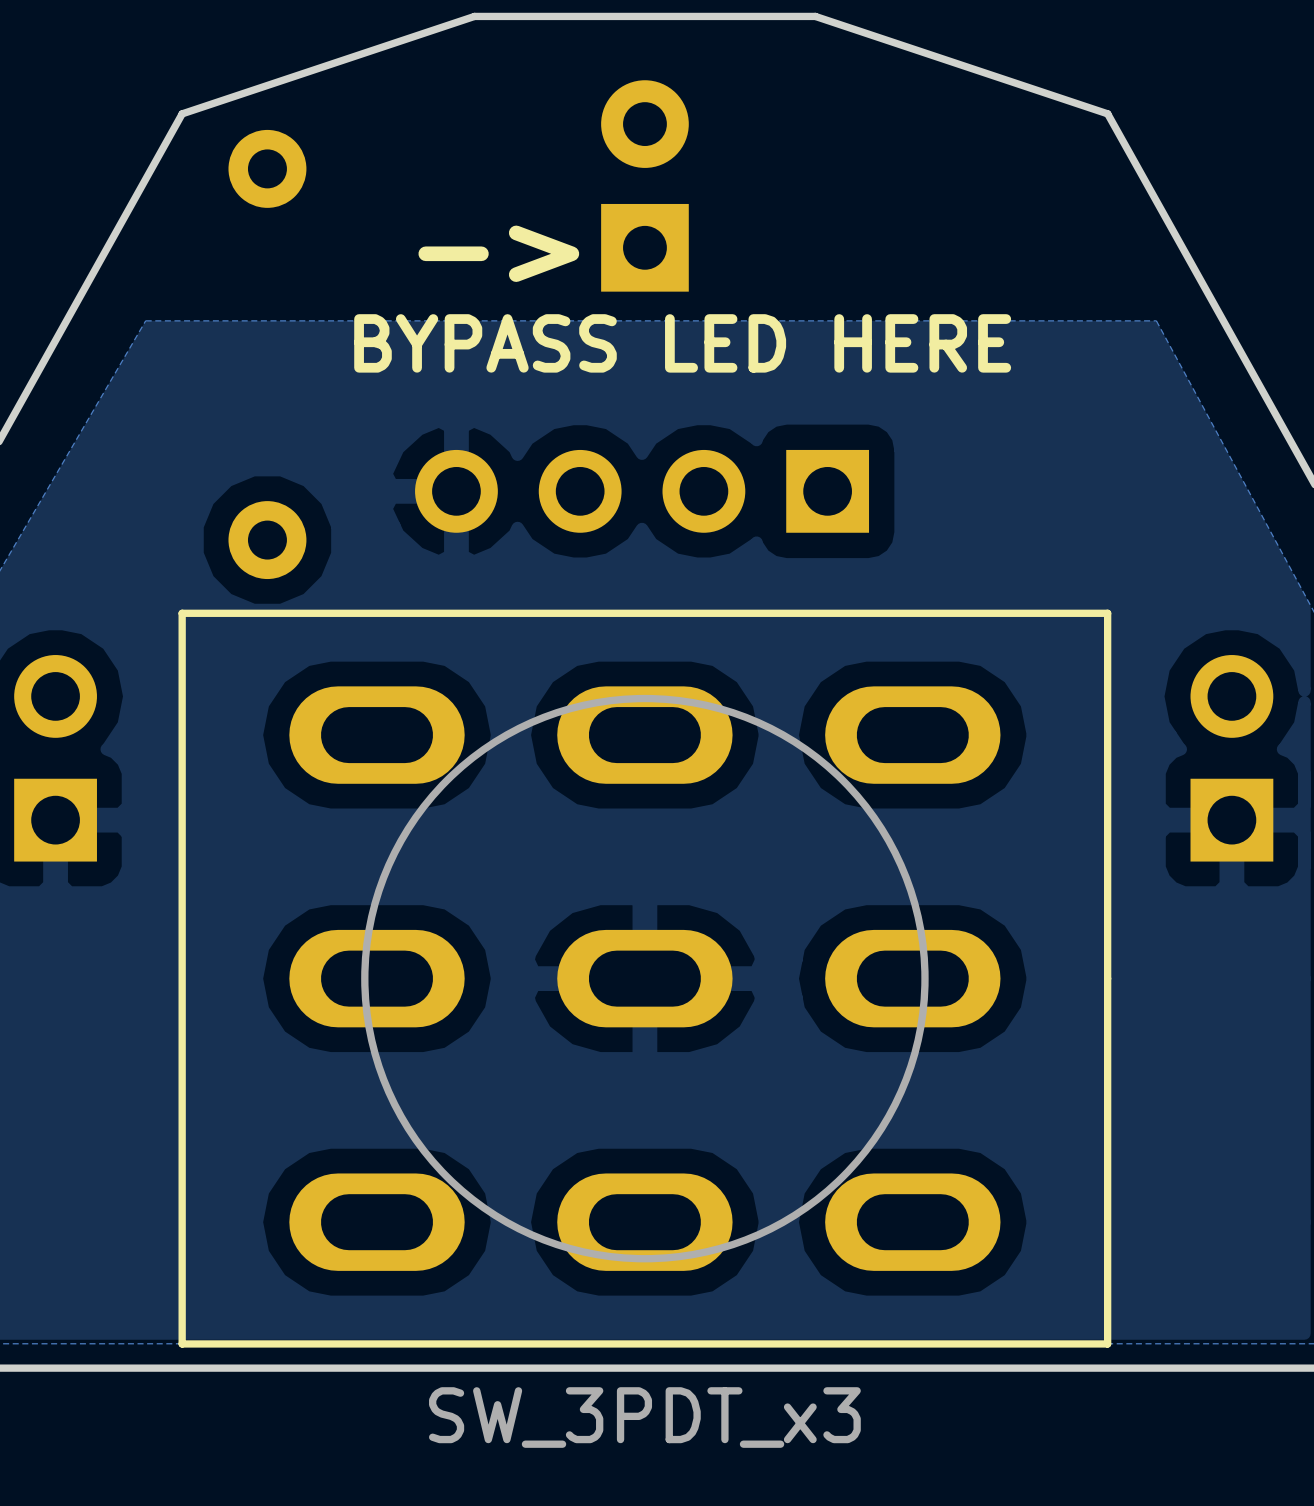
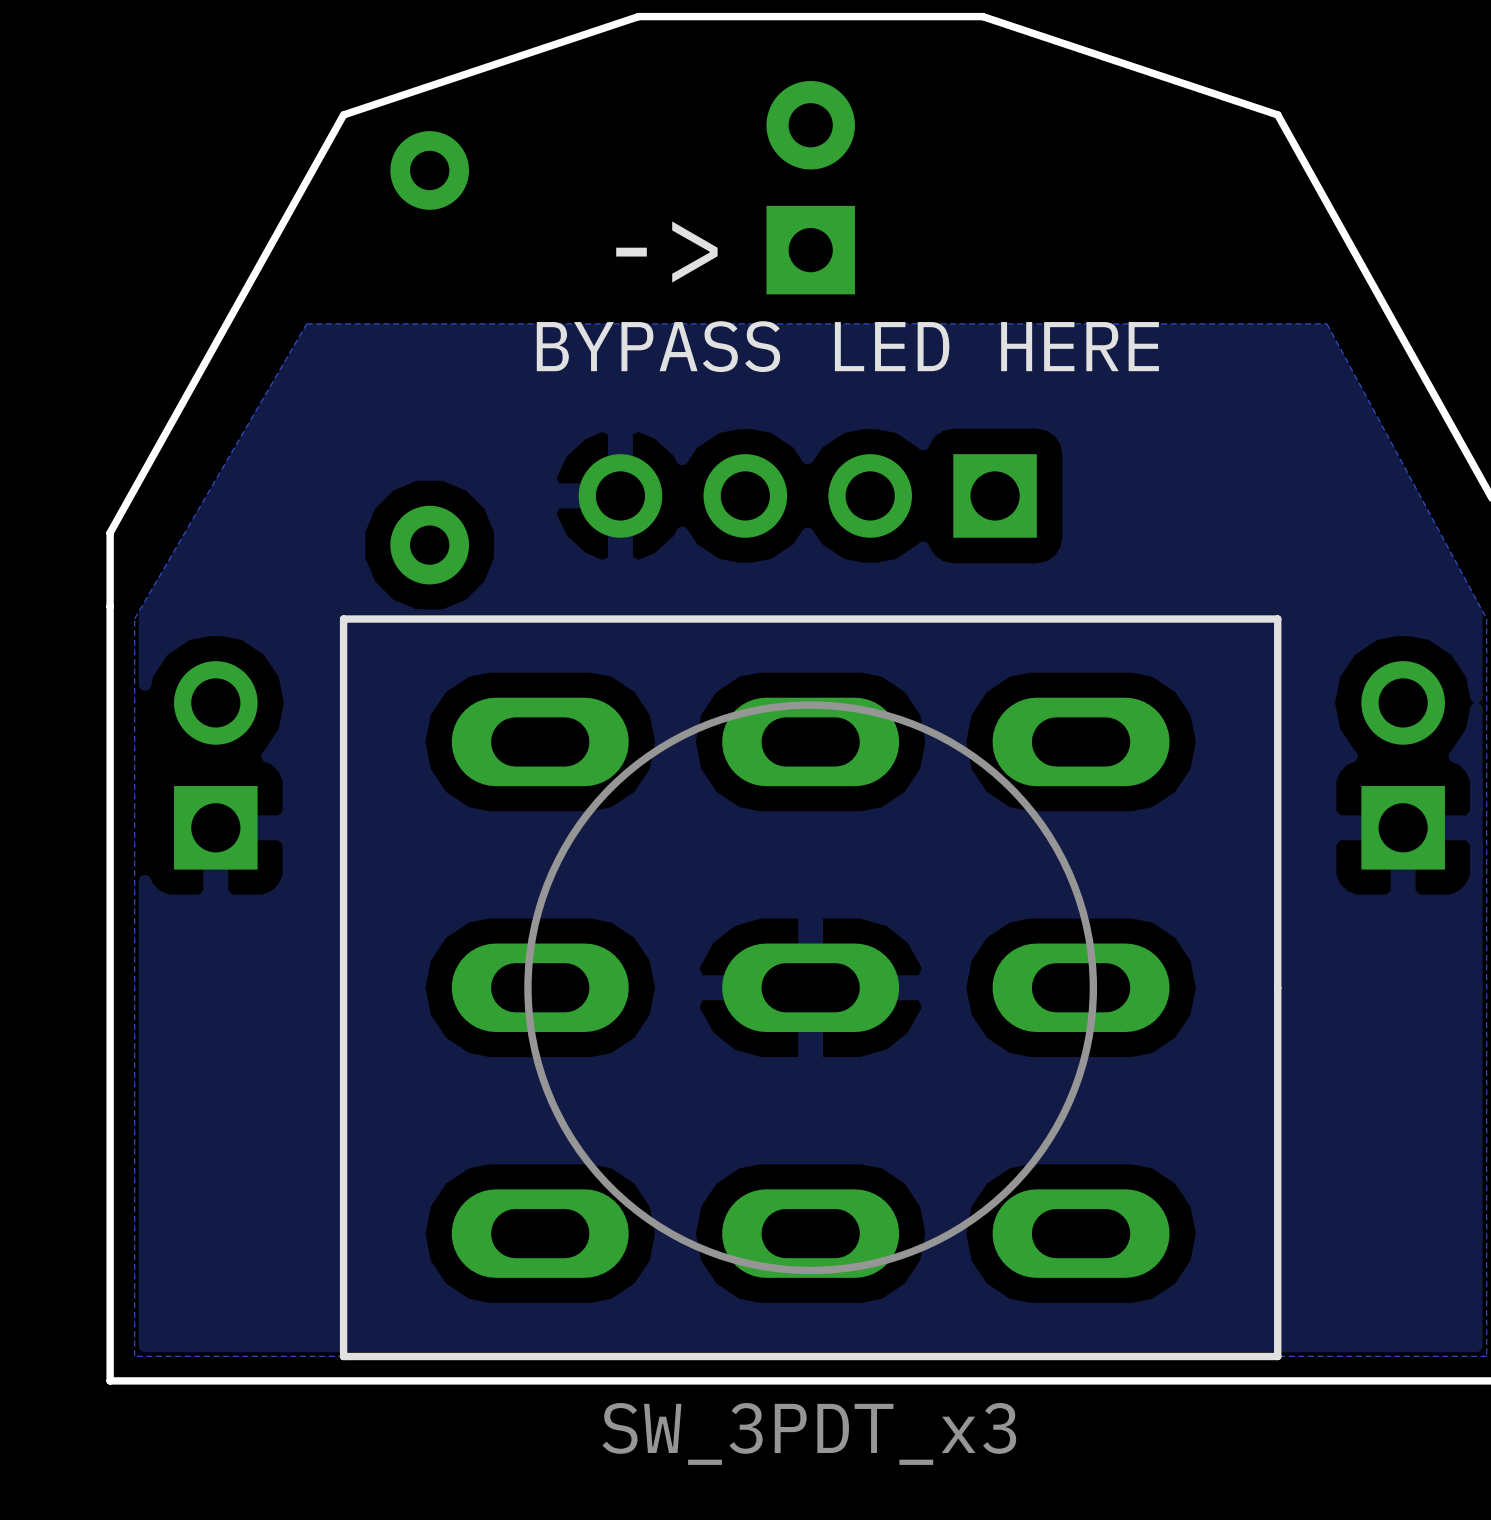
part footprint: [178, 609, 1112, 1348] -> [339, 615, 1282, 1361]

